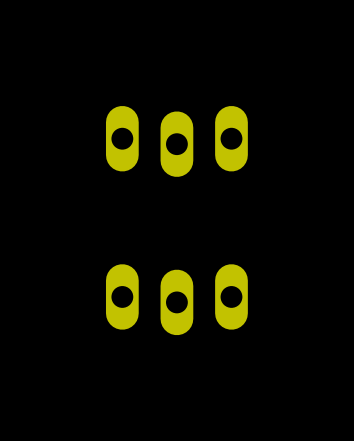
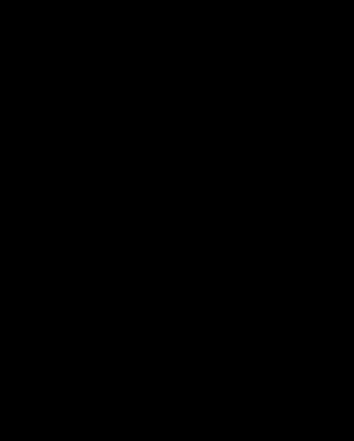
part: (176, 141) -> none
part: (176, 299) -> none

